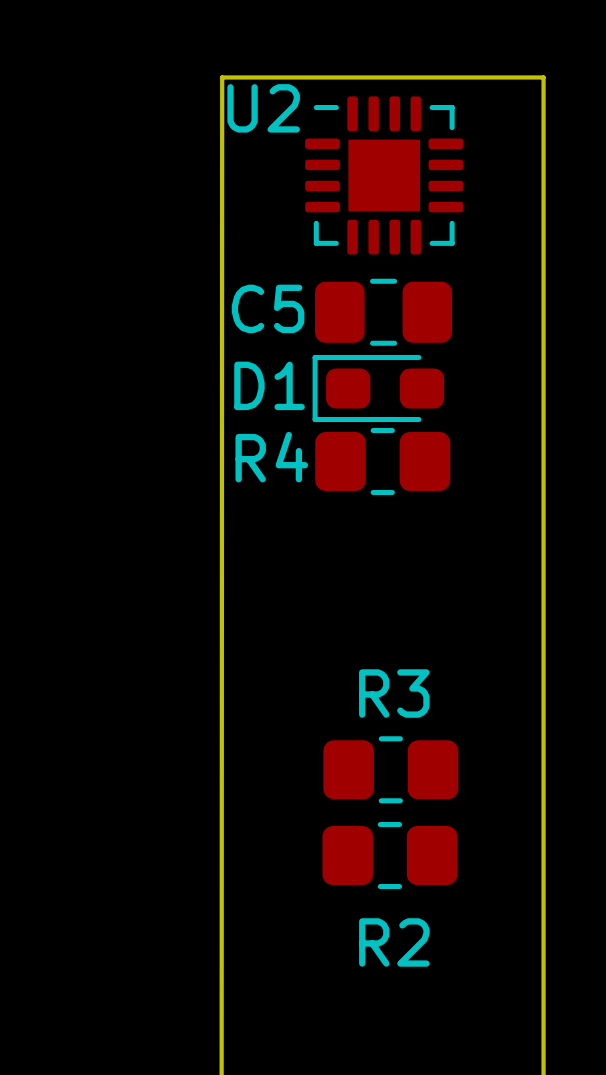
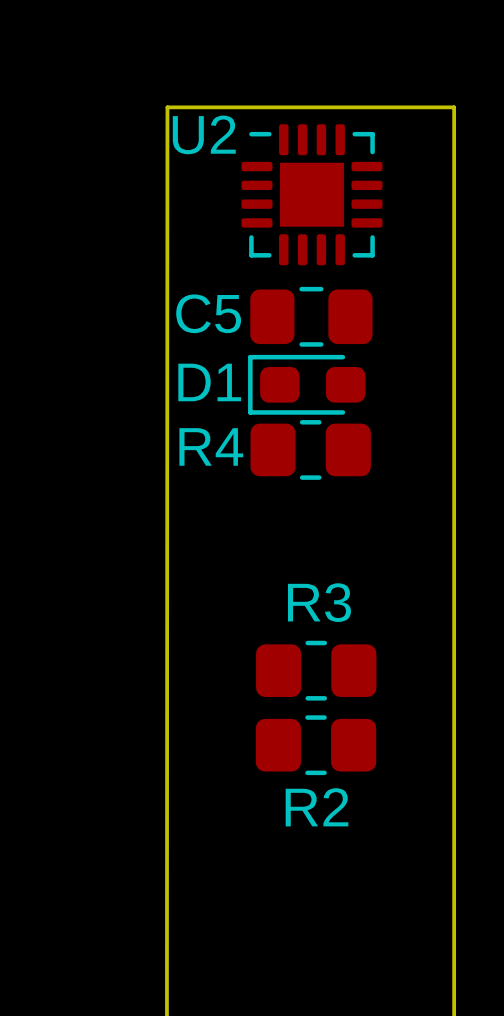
R3 position: (390, 769) -> (316, 670)
R2 position: (389, 855) -> (316, 745)
R2 name position: R2 (394, 942) -> R2 (317, 807)

